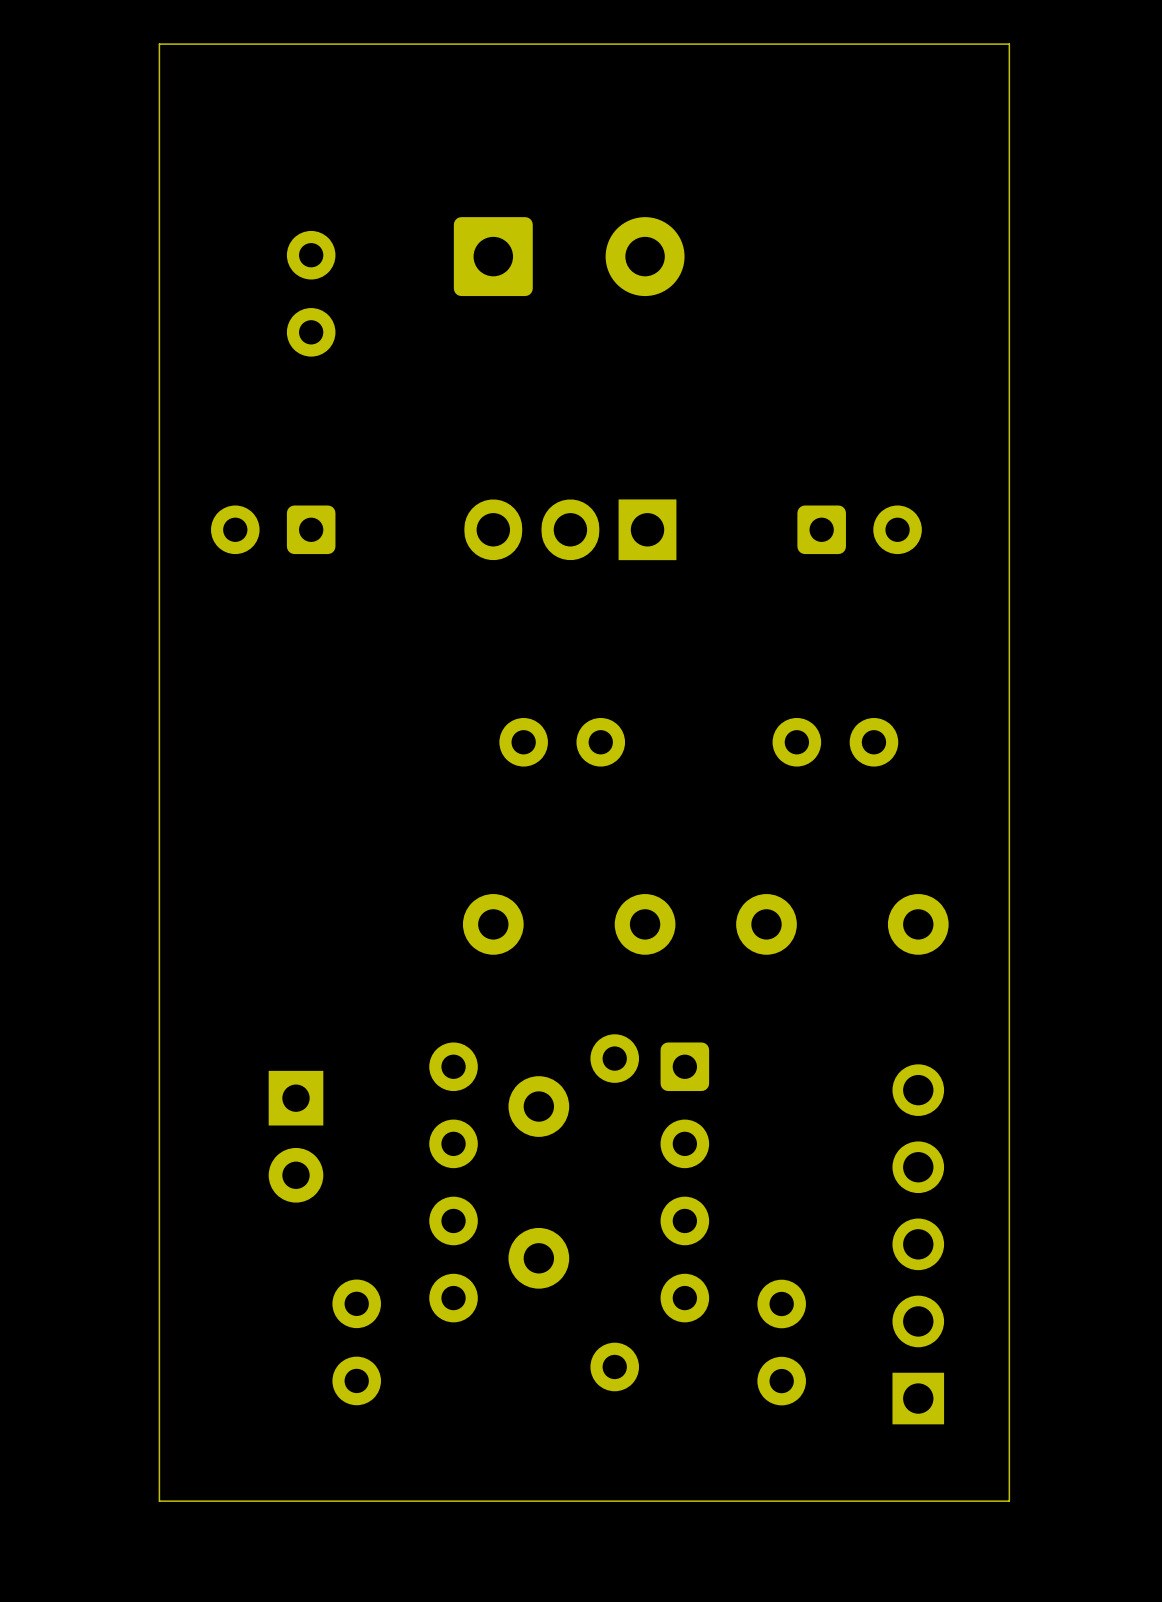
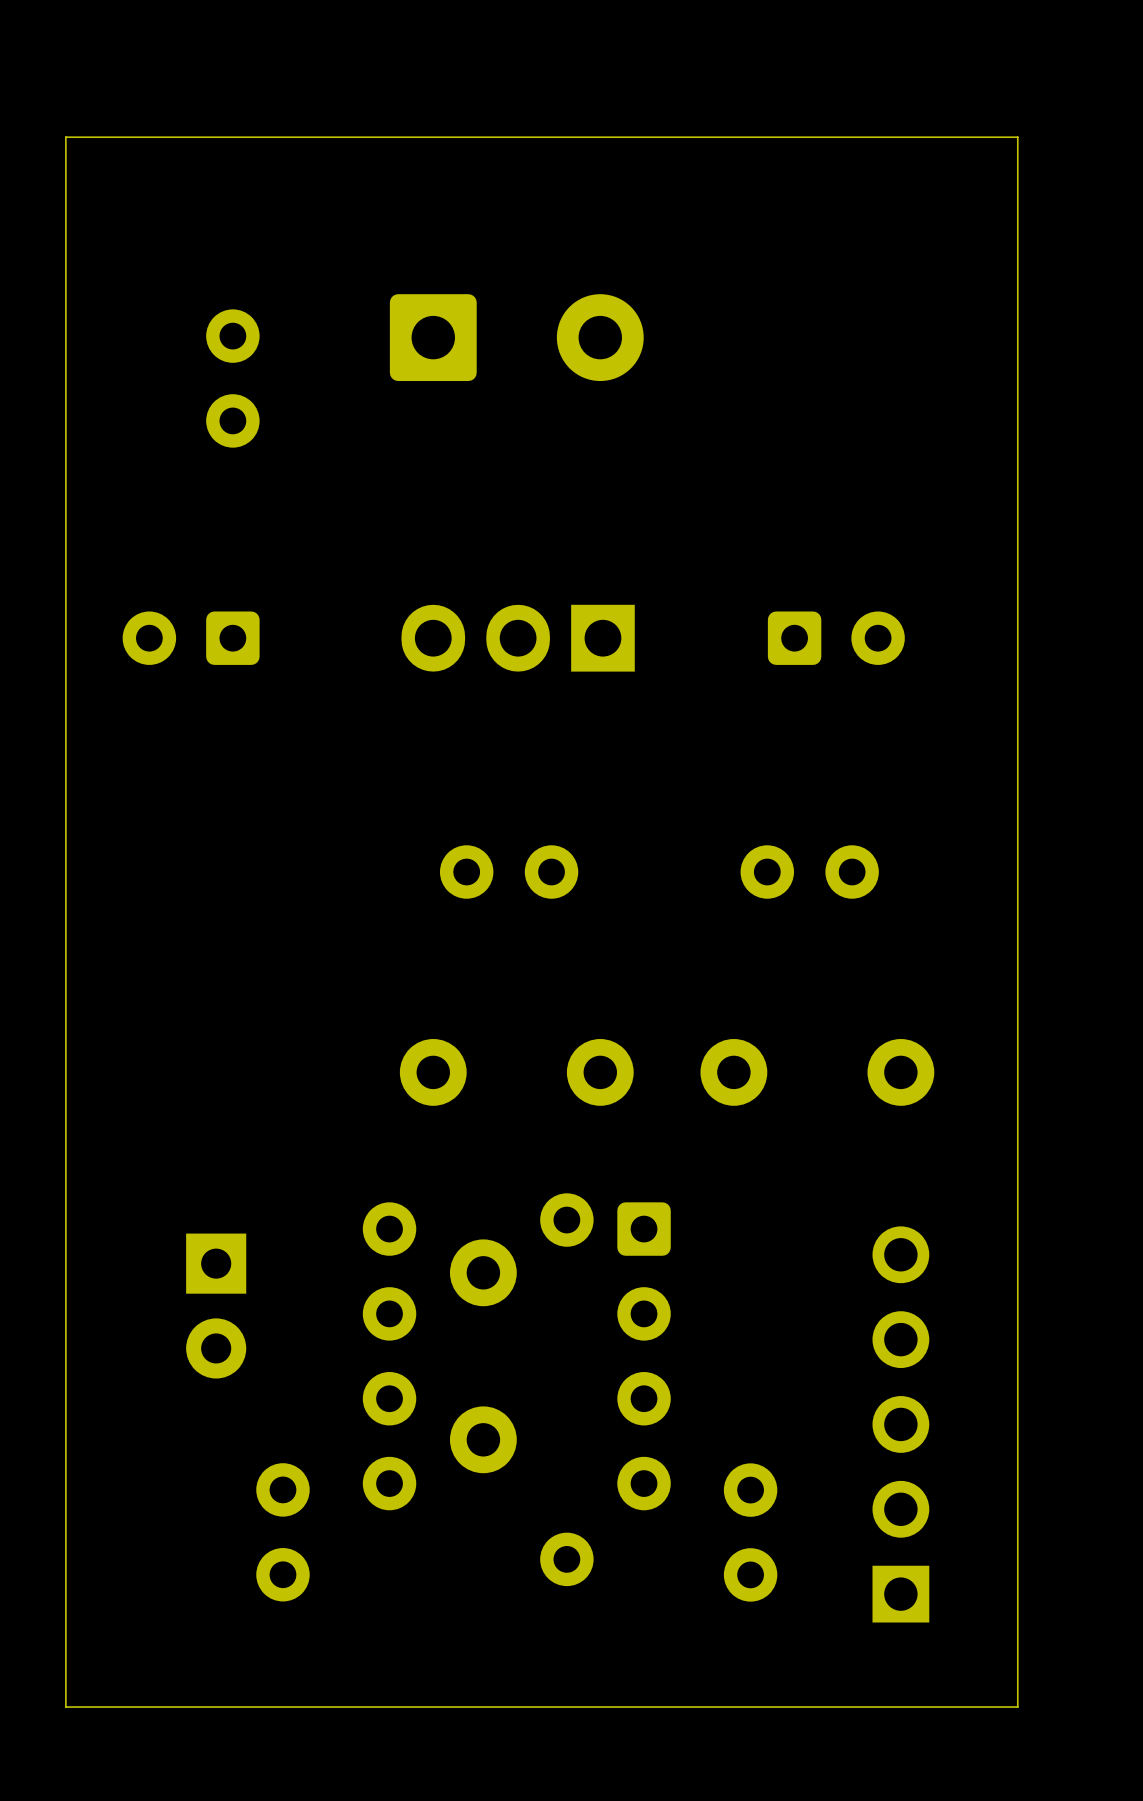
board edge: (159, 74) (159, 44) (1009, 44) (1009, 1501) -> (65, 137) (1017, 137) (1017, 1707) (1001, 1707)

